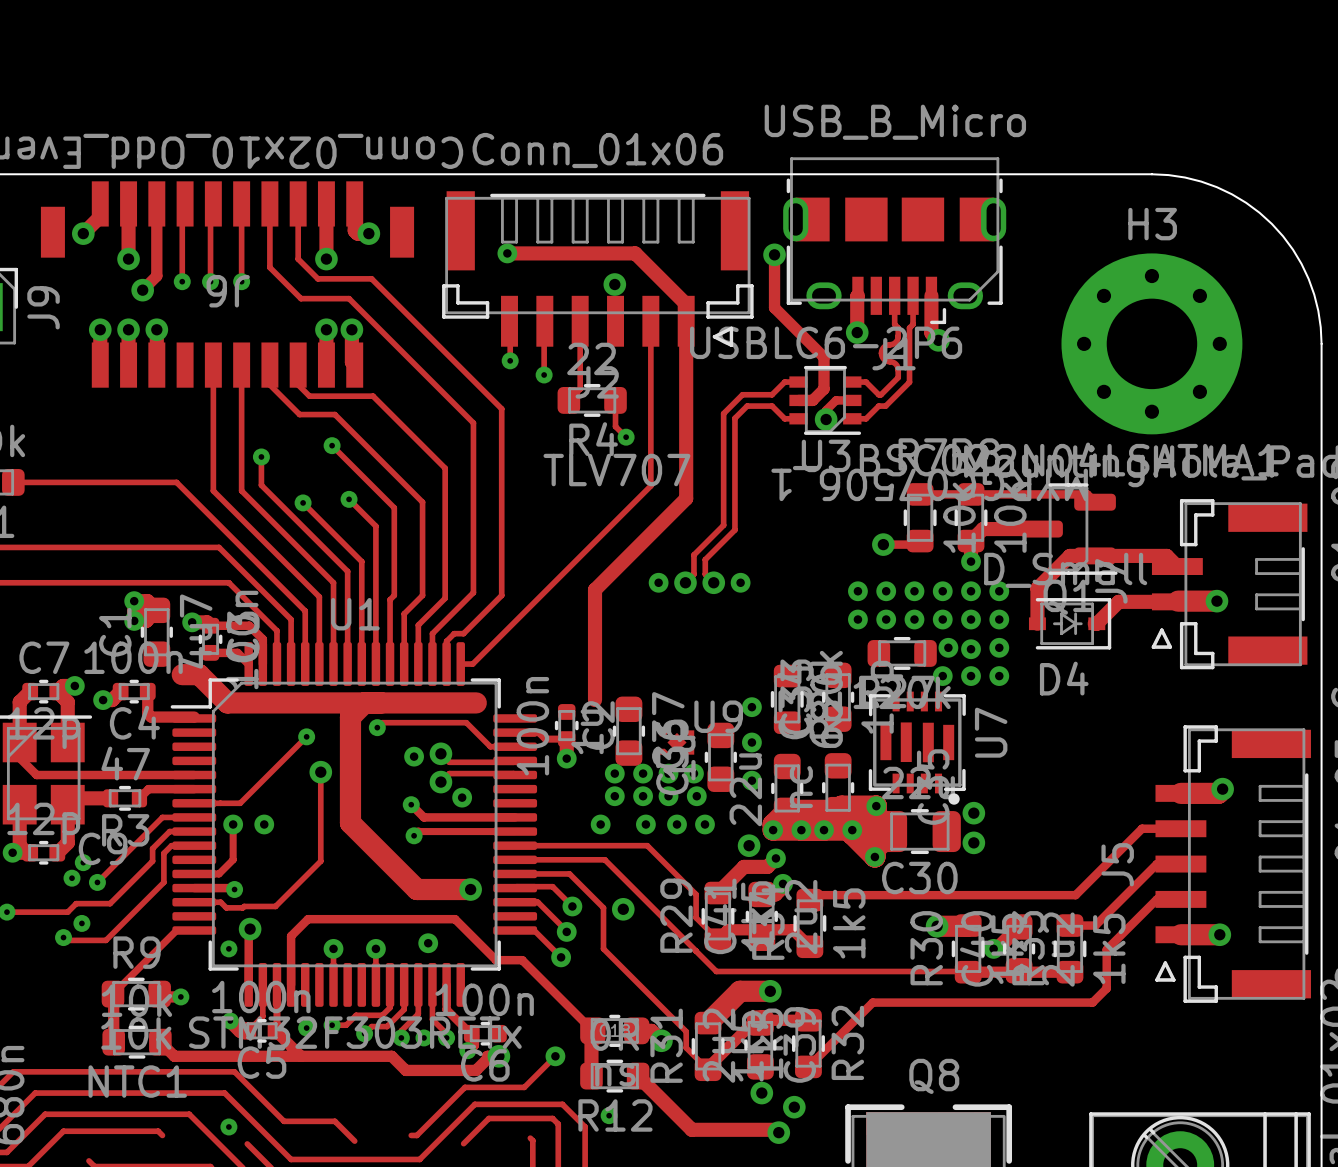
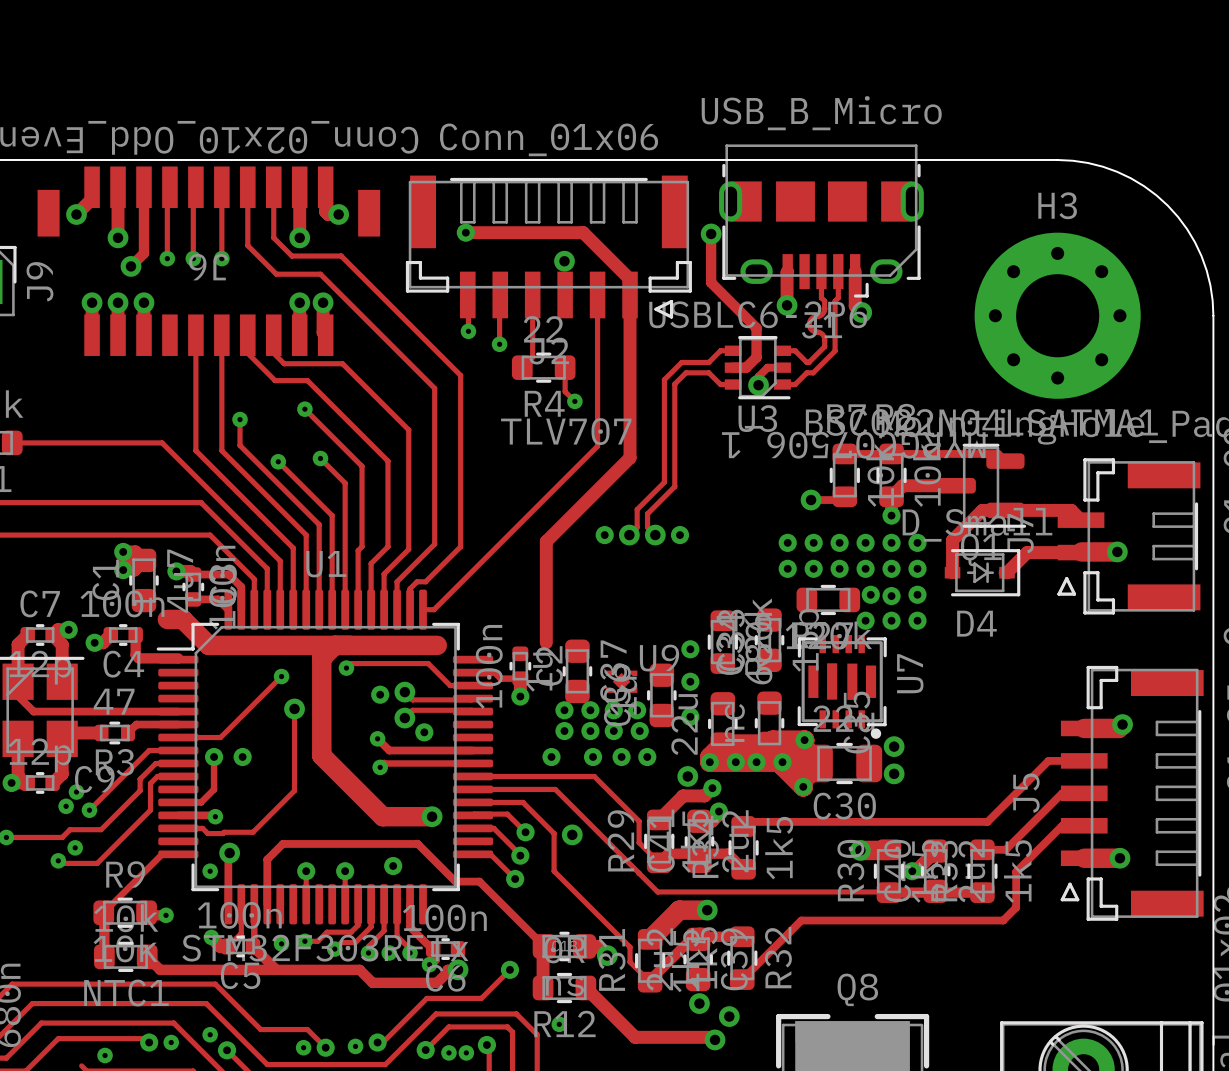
via: none -> (149, 1042)
via: none -> (171, 1042)
via: none -> (377, 1042)
via: none -> (486, 1045)
via: none -> (355, 1046)
via: none -> (303, 1047)
via: none -> (325, 1047)
via: none -> (227, 1050)
via: none -> (425, 1050)
via: none -> (448, 1052)
via: none -> (466, 1052)
via: none -> (105, 1055)

